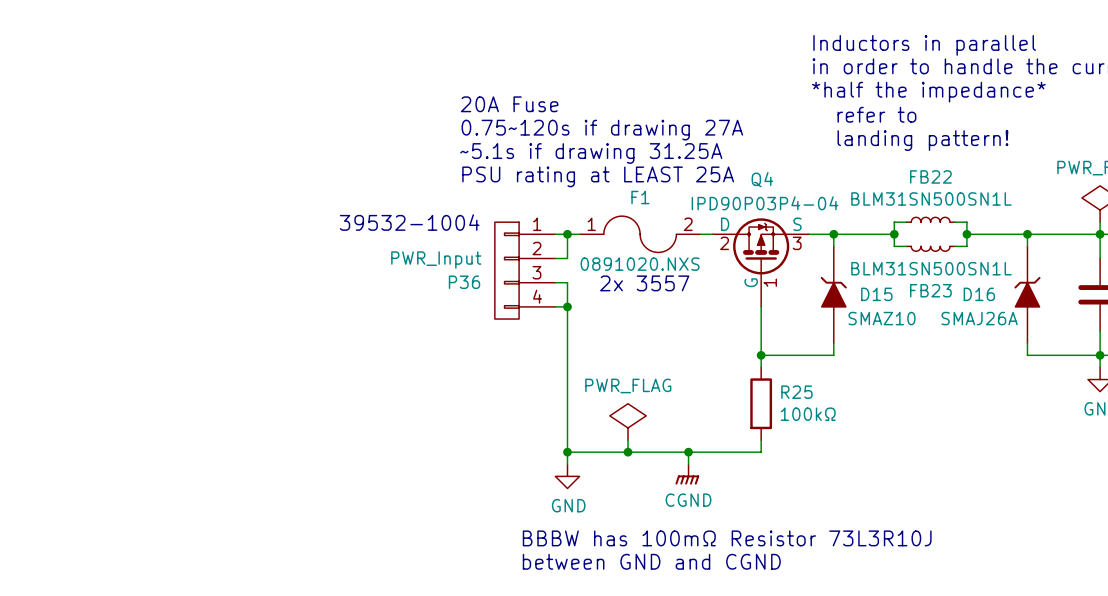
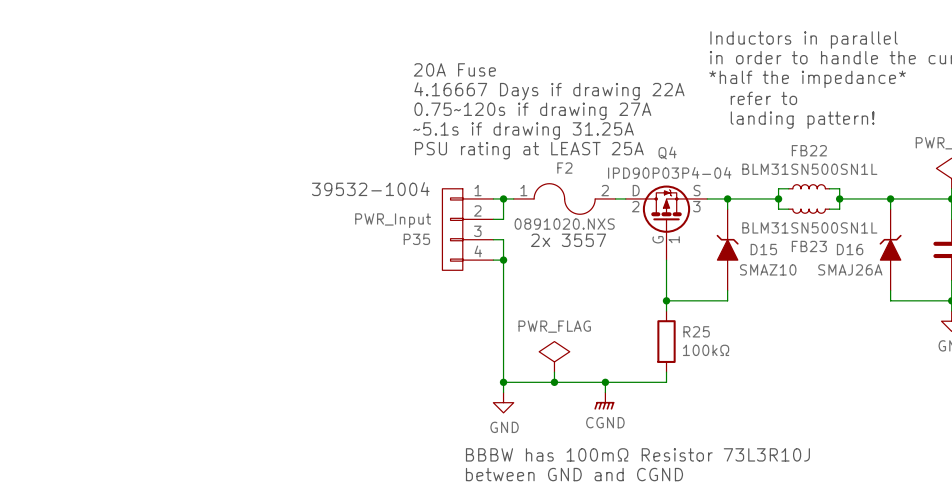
text: none -> 20A Fuse (454, 69)
text: 20A Fuse (509, 104) -> 4.16667 Days if drawing 22A (549, 91)
F1 name: F1 (640, 197) -> F2 (564, 168)
P36 name: P36 (464, 282) -> P35 (416, 239)

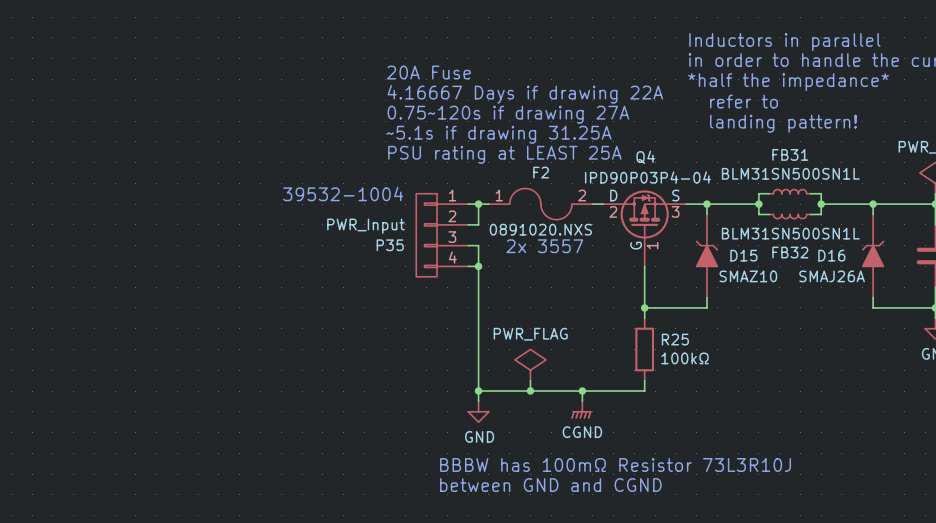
FB22 name: FB22 (809, 150) -> FB31 (790, 154)
FB23 name: FB23 (809, 246) -> FB32 (790, 252)

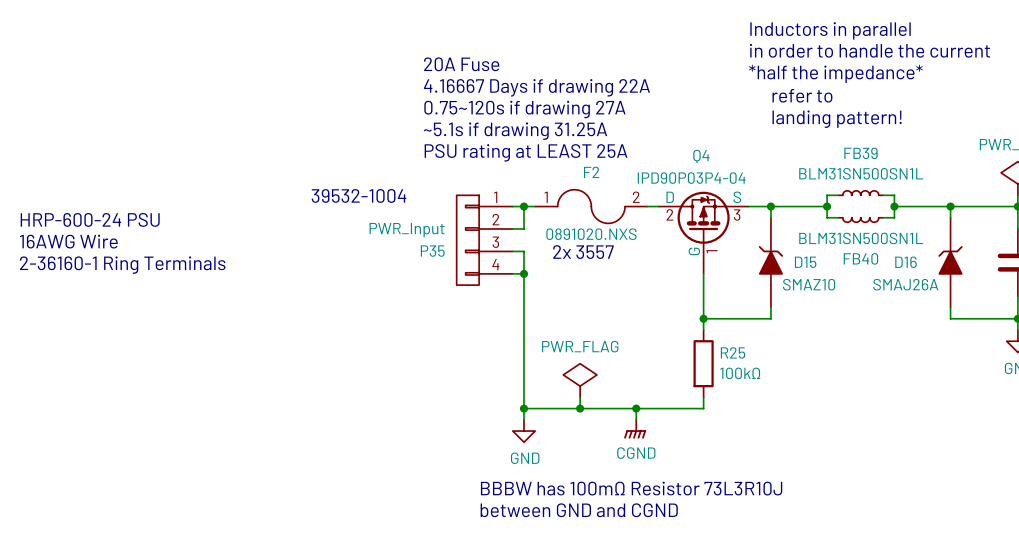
FB31 name: FB31 (790, 154) -> FB39 (860, 153)
text: none -> HRP-600-24 PSU (90, 219)
text: none -> 16AWG Wire (68, 241)
FB32 name: FB32 (790, 252) -> FB40 (860, 258)
text: none -> 2-36160-1 Ring Terminals (122, 265)

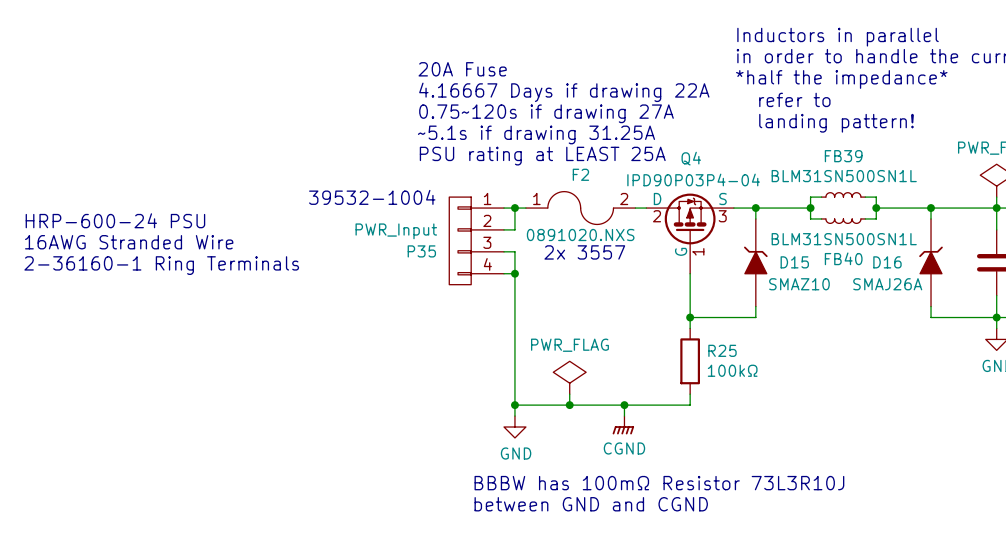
text: 16AWG Wire (68, 241) -> 16AWG Stranded Wire (129, 242)

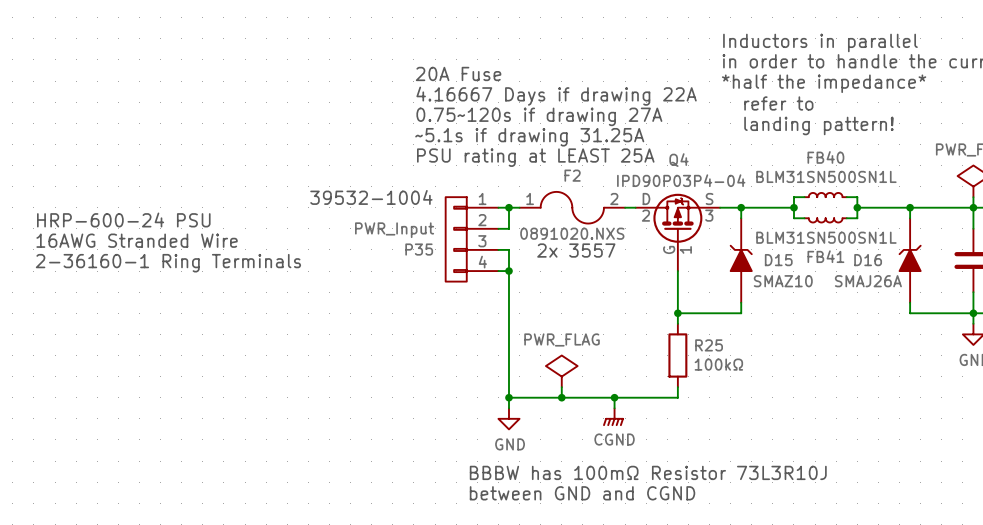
FB39 name: FB39 (843, 156) -> FB40 (825, 157)
FB40 name: FB40 (843, 258) -> FB41 (825, 256)

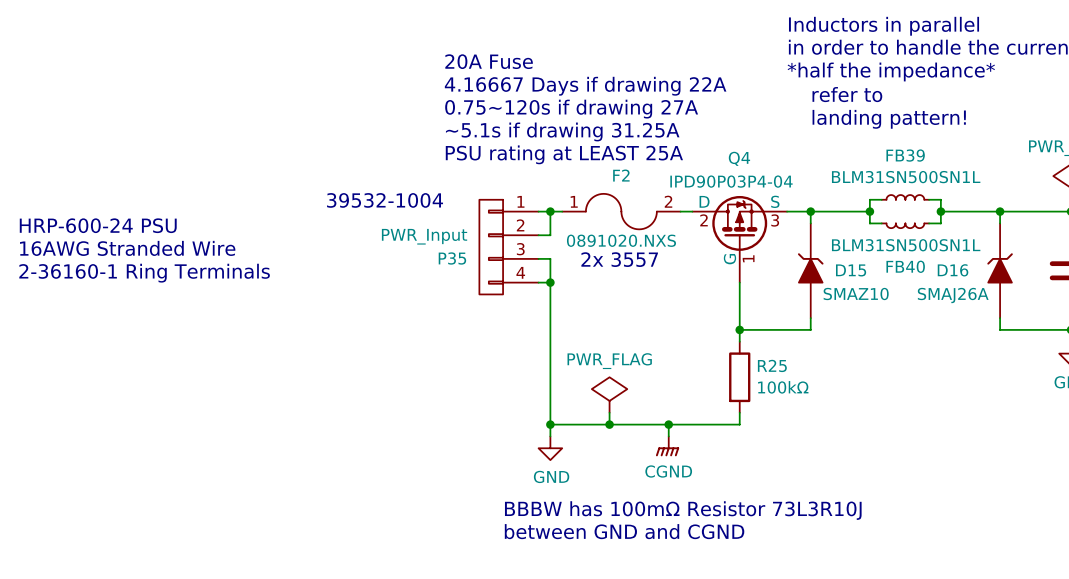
FB40 name: FB40 (825, 157) -> FB39 (905, 155)
FB41 name: FB41 (825, 256) -> FB40 (905, 266)

